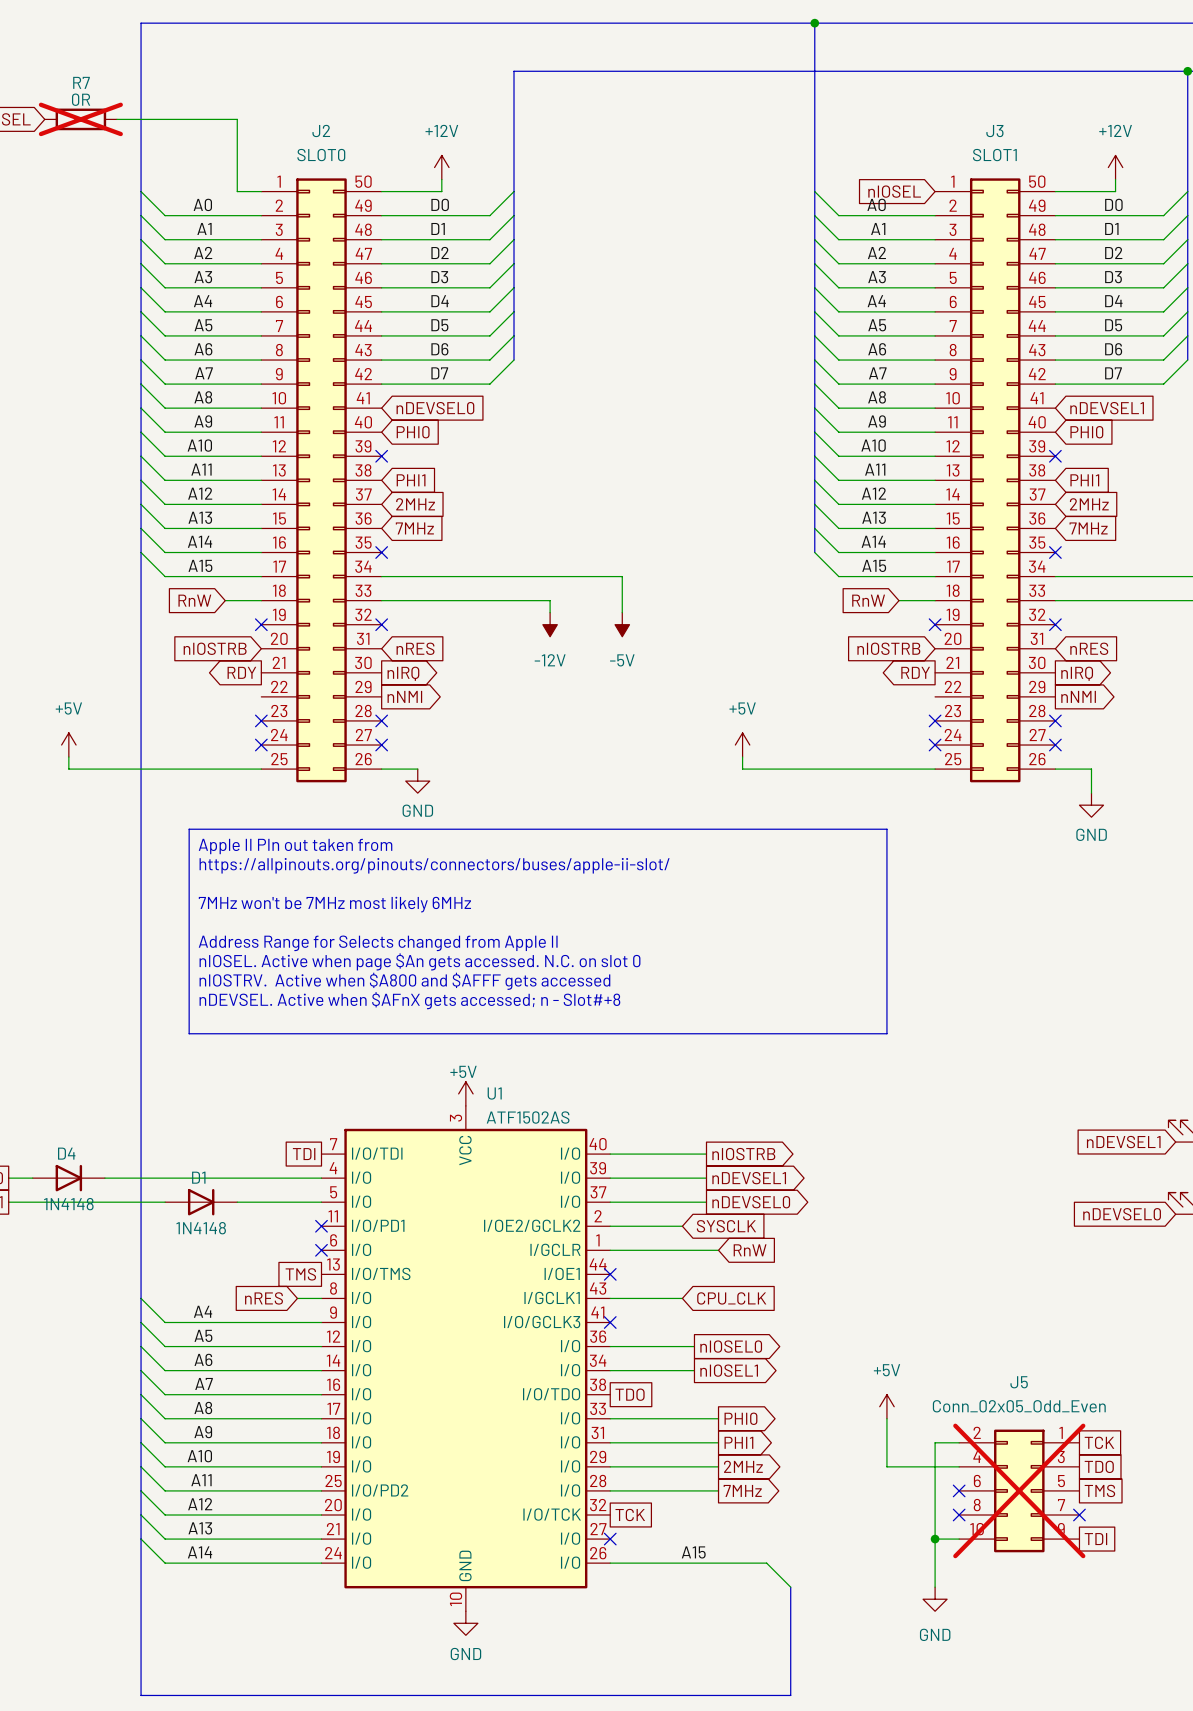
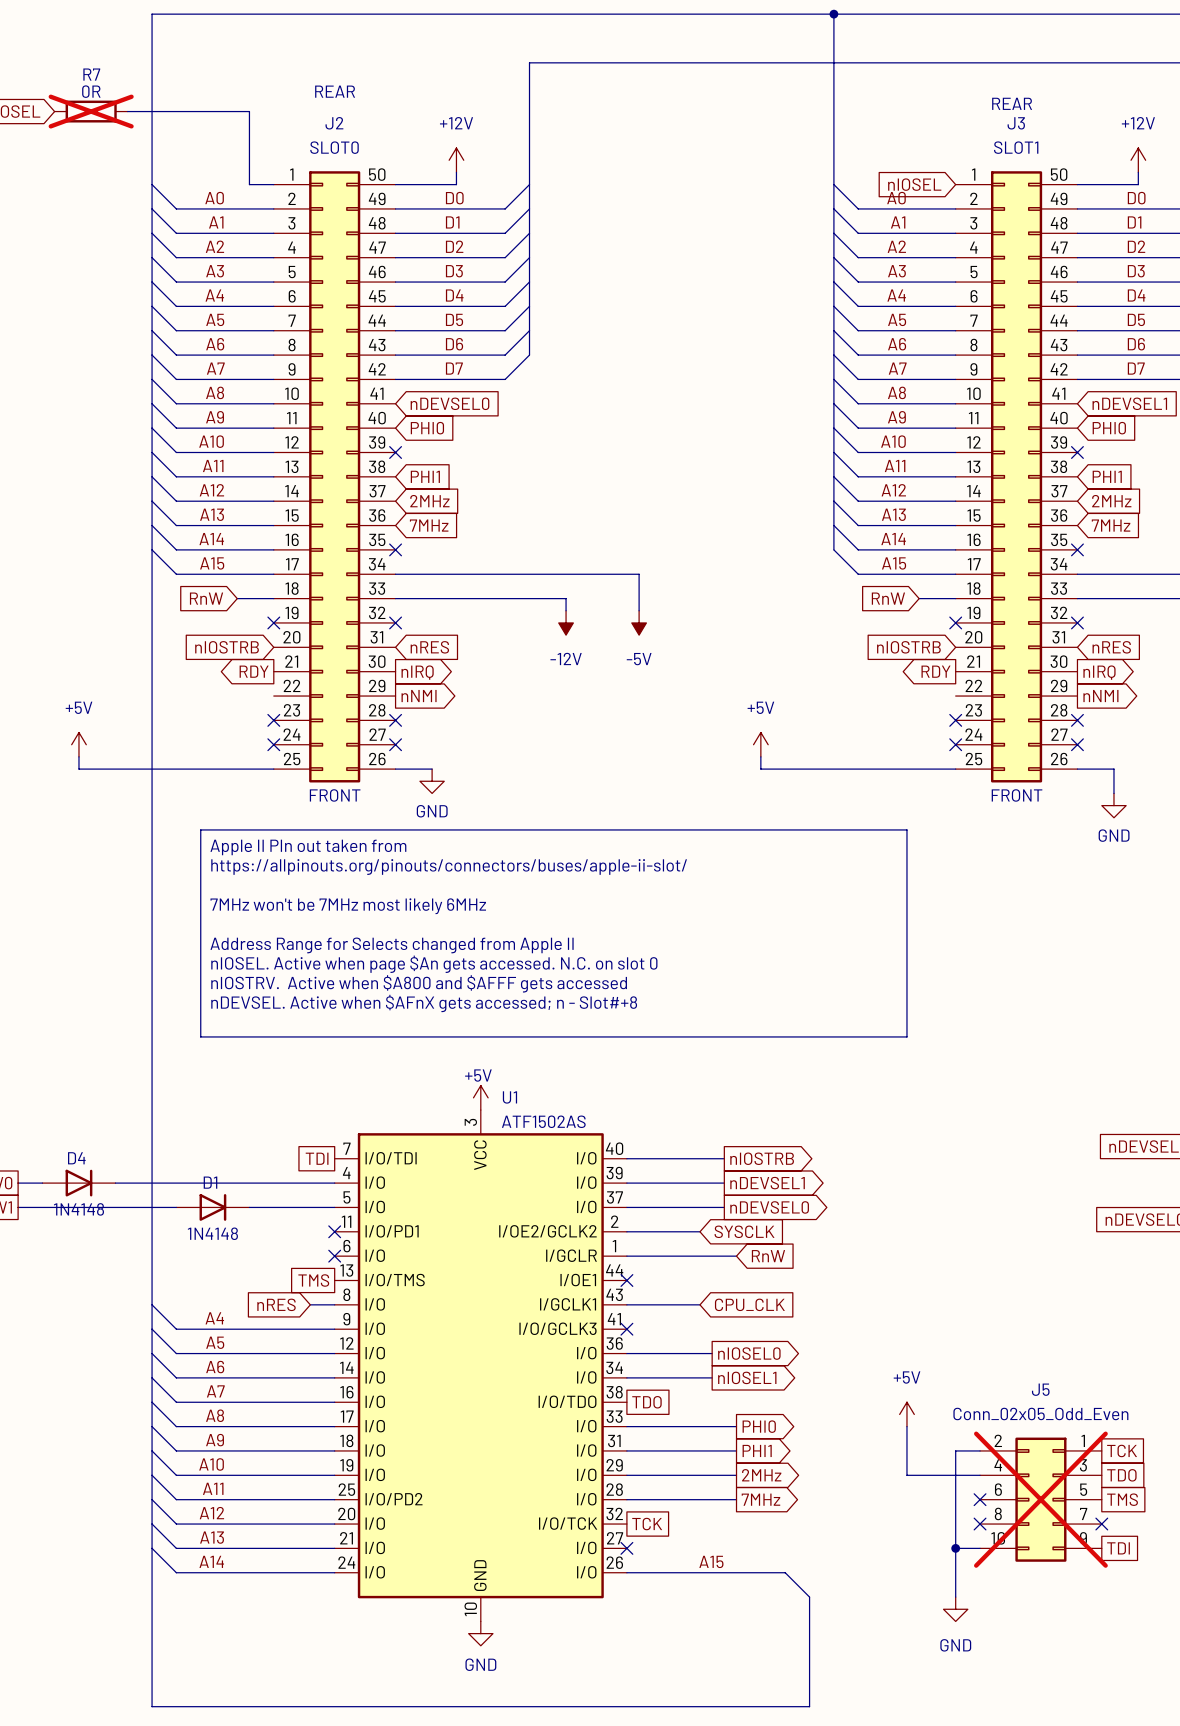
text: none -> REAR (335, 91)
text: none -> REAR (1012, 103)
text: none -> FRONT (335, 795)
text: none -> FRONT (1017, 795)

